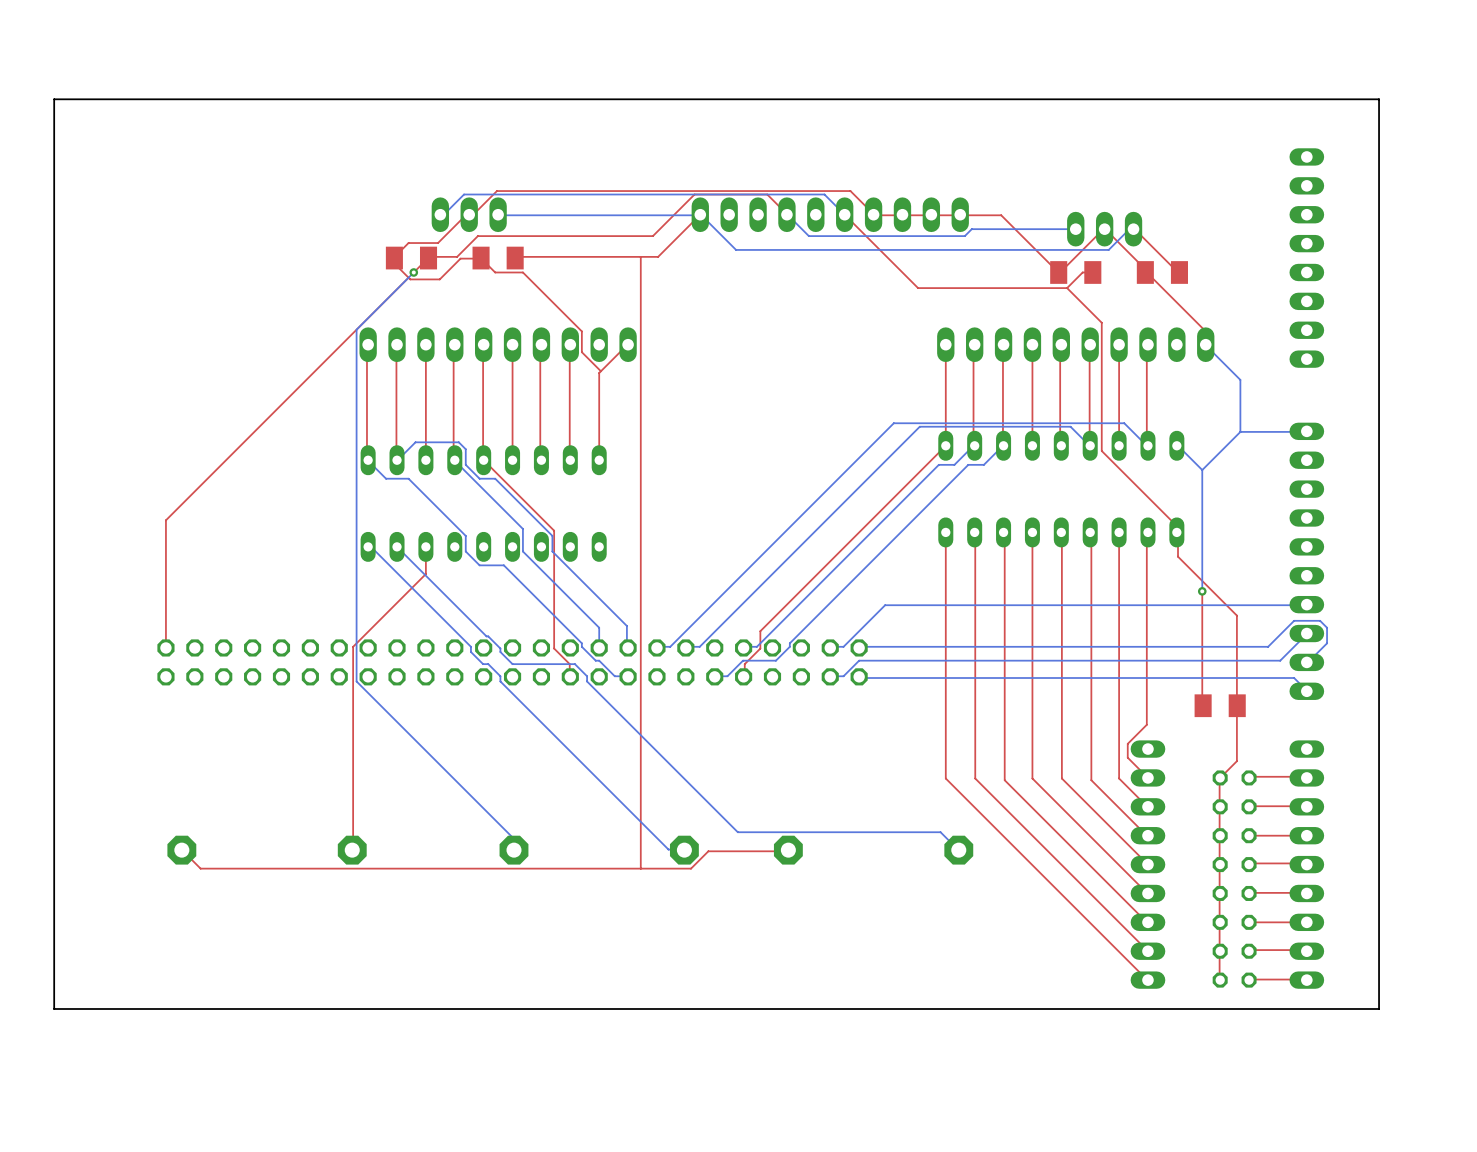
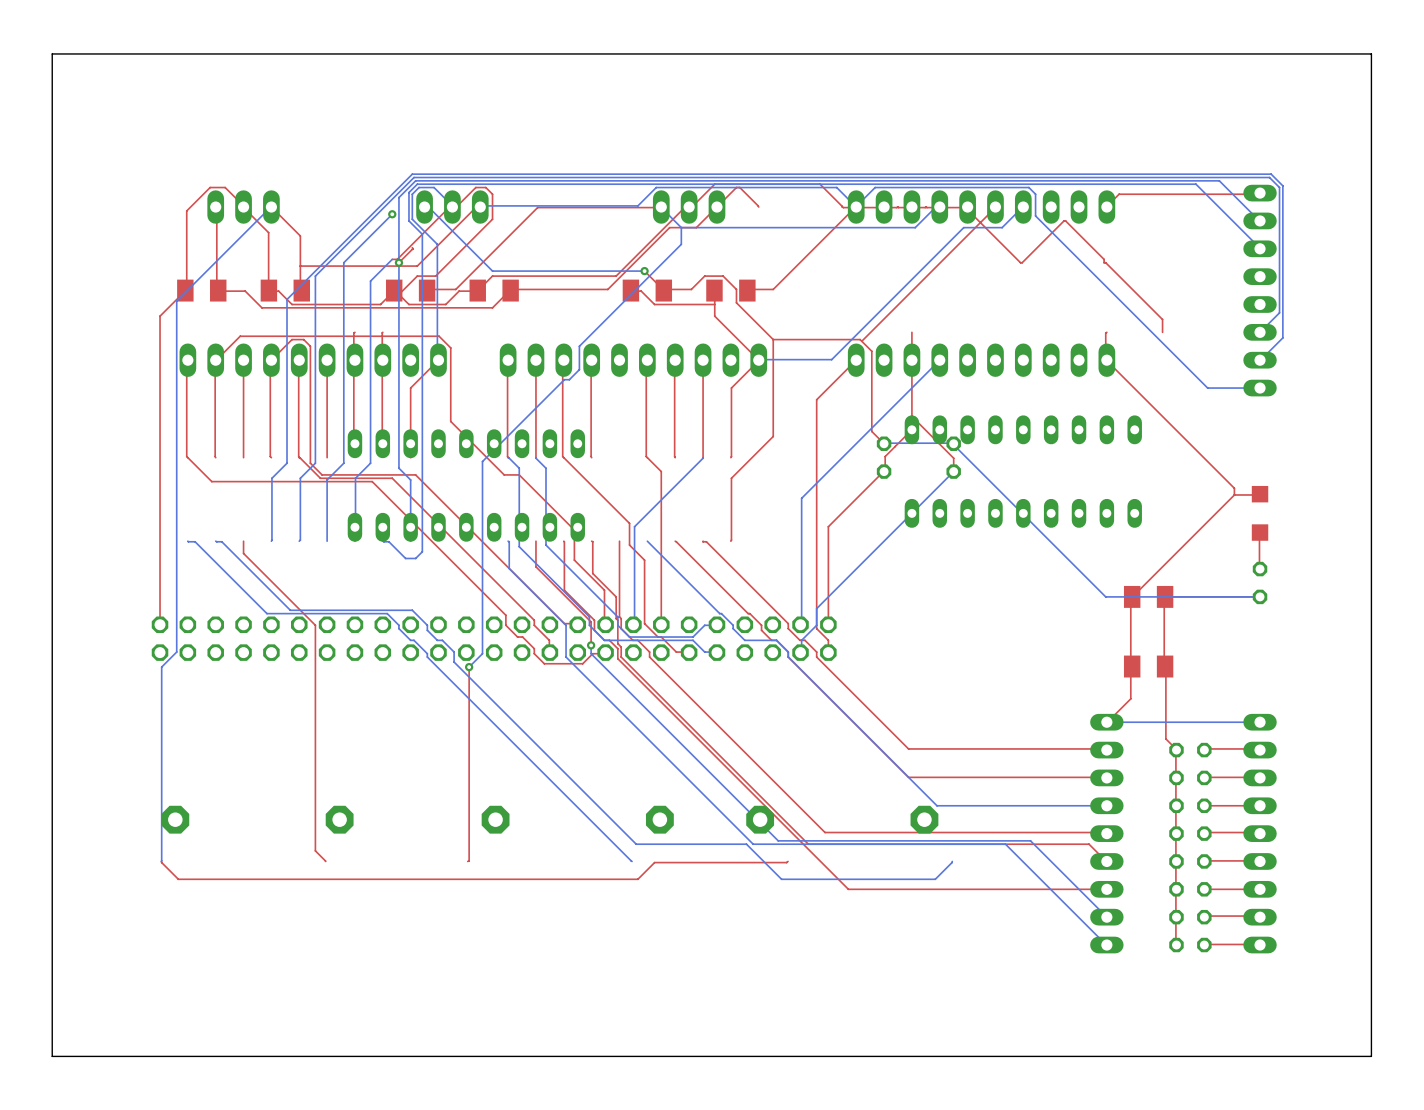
board edge: (54, 99) (1379, 99) (1379, 1008) (54, 1008) -> (52, 95) (52, 53) (1371, 53) (1371, 1056) (52, 1056) (52, 972)
top track: (741, 191) (496, 191) (493, 194) -> (714, 184) (693, 205) (684, 207) (616, 276) (492, 276) (477, 291) (459, 291) (445, 304) (408, 304) (394, 290)
top track: none -> (475, 187) (485, 187) (492, 194) (492, 219) (435, 276) (417, 276) (398, 294) (394, 290)
bottom track: (680, 194) (464, 194) (444, 213) (440, 214) -> (656, 187) (637, 205) (480, 207)
top track: (763, 194) (694, 194) (652, 236) (477, 236) (457, 256) (428, 258) -> (736, 187) (696, 227) (669, 227) (607, 289) (510, 289) (492, 307) (261, 307) (245, 291) (218, 291) (216, 289) (215, 207)
bottom track: (824, 194) (844, 214) -> (794, 187) (836, 187) (856, 207) (875, 187) (1028, 187) (1035, 194) (1035, 215) (1207, 388) (1260, 388)
top track: none -> (1260, 193) (1119, 194) (1105, 207)
part: none -> (243, 207)
top track: none -> (271, 207) (300, 235) (301, 290)
bottom track: none -> (271, 207) (176, 301) (176, 652) (161, 667) (161, 861)
bottom track: none -> (424, 207) (429, 207) (492, 271) (644, 271)
bottom track: none -> (452, 207) (434, 187) (419, 187) (412, 194) (412, 219) (437, 244) (438, 360)
top track: none -> (480, 207) (475, 207) (417, 266) (300, 266)
bottom track: (498, 214) (700, 214) (736, 249) (1108, 249) (1129, 229) (1133, 229) -> none
top track: none -> (661, 207) (537, 207) (455, 289) (427, 290)
bottom track: none -> (661, 207) (681, 227)
top track: (700, 214) (658, 256) (514, 256) -> none
part: none -> (689, 207)
bottom track: (786, 214) (808, 236) -> (681, 227) (779, 227)
part: (830, 214) -> none
top track: (844, 214) (918, 288) (1067, 288) -> none
top track: none -> (856, 207) (773, 289) (747, 290)
part: none -> (981, 207)
top track: none -> (995, 207) (861, 341)
bottom track: none -> (1023, 207) (1002, 227) (963, 227) (831, 359) (758, 360)
via: none -> (392, 214)
bottom track: (1075, 229) (971, 229) (964, 236) (949, 236) -> (939, 207) (935, 207) (915, 227)
part: (1104, 229) -> none
top track: (1133, 229) (1179, 272) -> none
bottom track: none -> (1260, 220) (1219, 180) (415, 180) (398, 197) (398, 468) (410, 479) (410, 541)
top track: (438, 243) (408, 243) (394, 256) (394, 263) (410, 279) (439, 279) (460, 258) (481, 258) (495, 272) (522, 272) (581, 331) (581, 352) (600, 371) -> (422, 234) (397, 259) (392, 259)
top track: (640, 256) (640, 643) -> (591, 541) (592, 573) (616, 596) (616, 618) (617, 620)
part: (411, 258) -> none
part: (498, 258) -> none
bottom track: none -> (1260, 248) (1195, 184) (417, 184) (408, 192) (408, 220) (422, 234) (422, 551) (415, 558) (405, 558) (388, 541) (382, 541)
part position: (1306, 258) -> (1260, 290)
bottom track: none -> (392, 259) (370, 281) (370, 463) (355, 478) (354, 541)
bottom track: (413, 272) (356, 329) -> (392, 214) (343, 262) (343, 317)
part: (1075, 272) -> none
top track: (1092, 272) (1082, 272) (1067, 288) -> none
part: (1162, 272) -> none
top track: (408, 277) (165, 520) -> (394, 290) (380, 304) (292, 304) (278, 291) (268, 290) (268, 232) (225, 187) (210, 187) (186, 210) (186, 289) (160, 316) (160, 501)
top track: none -> (644, 271) (663, 290) (691, 289) (704, 276) (723, 276) (736, 289) (736, 302) (773, 339)
via: none -> (644, 271)
top track: (1067, 288) (1101, 322) (1101, 450) (1176, 525) (1178, 556) (1236, 615) (1236, 761) (1220, 777) -> (1260, 596) (1164, 596) (1165, 738) (1176, 750)
part: none -> (201, 290)
part: none -> (285, 290)
part: none -> (410, 290)
part: none -> (494, 290)
top track: none -> (630, 290) (641, 291) (654, 304) (714, 304)
part: none -> (647, 290)
top track: none -> (714, 290) (714, 316) (758, 360) (731, 388) (730, 457)
part: none -> (730, 290)
top track: (425, 344) (425, 402) -> (438, 360) (410, 388)
top track: (454, 344) (454, 460) -> none
top track: (483, 344) (483, 459) (554, 530) (554, 643) -> (299, 360) (299, 457) (320, 478) (392, 478) (534, 620)
part: (498, 344) -> none
top track: (512, 344) (512, 460) -> none
top track: (541, 344) (541, 460) -> none
top track: (570, 344) (570, 460) -> none
top track: (628, 344) (599, 373) (599, 460) -> none
top track: (974, 344) (974, 445) -> none
top track: (1003, 344) (1003, 445) -> none
top track: (1032, 344) (1032, 445) -> none
top track: (1061, 344) (1061, 445) -> none
part position: (1075, 344) -> (981, 360)
top track: (1090, 344) (1090, 445) -> none
top track: (1119, 344) (1119, 445) -> none
bottom track: (1205, 344) (1240, 379) (1240, 431) -> none
bottom track: none -> (1260, 332) (1279, 312) (1279, 187) (1269, 177) (413, 177) (315, 276) (315, 463) (300, 478) (299, 541)
top track: none -> (773, 339) (860, 339) (871, 351) (871, 431) (884, 443)
top track: none -> (773, 339) (773, 436) (731, 478) (730, 541)
top track: none -> (187, 360) (186, 456) (211, 481) (372, 481) (505, 615) (505, 625) (517, 637) (522, 637) (534, 648) (534, 653) (544, 663) (582, 663) (592, 653) (605, 652)
top track: none -> (243, 360) (243, 457)
part: none -> (313, 360)
top track: none -> (327, 360) (327, 457)
top track: none -> (508, 360) (508, 457)
top track: none -> (535, 360) (535, 457)
top track: none -> (563, 360) (562, 456) (629, 523) (629, 545) (644, 560) (644, 623) (676, 652) (689, 652)
top track: none -> (591, 360) (591, 457)
part: none -> (633, 360)
top track: none -> (647, 360) (646, 456) (661, 471) (661, 624)
top track: none -> (675, 360) (675, 457)
top track: none -> (703, 360) (703, 457)
top track: none -> (856, 360) (816, 399) (816, 628) (828, 640) (828, 652)
top track: (1146, 373) (1147, 445) -> (1105, 359) (1234, 488) (1234, 494)
bottom track: none -> (1260, 360) (1282, 337) (1282, 185) (1271, 174) (412, 174) (287, 299) (287, 463) (271, 478) (271, 541)
top track: none -> (911, 416) (953, 458) (953, 471)
bottom track: (1240, 431) (1202, 470) -> none
bottom track: (1306, 431) (1240, 431) -> none
bottom track: (974, 445) (954, 464) (938, 464) (756, 646) (743, 647) -> none
bottom track: (1003, 445) (983, 464) (968, 464) (789, 643) (789, 646) (775, 660) (743, 660) (727, 676) (714, 676) -> none
bottom track: (1090, 445) (1070, 426) (919, 426) (699, 646) (685, 647) -> none
bottom track: (1147, 445) (1124, 423) (893, 423) (670, 646) (658, 646) -> (703, 457) (634, 526) (634, 623)
bottom track: (1176, 445) (1202, 470) -> none
bottom track: (368, 460) (386, 478) (408, 478) (465, 535) (465, 551) (479, 565) (503, 565) (528, 589) -> (508, 541) (509, 568)
bottom track: (397, 460) (415, 442) (458, 442) (465, 449) (465, 464) (479, 478) (495, 478) (552, 535) (552, 551) (566, 565) -> (535, 457) (545, 468) (545, 545)
bottom track: (454, 460) (522, 528) (522, 551) (538, 567) -> (508, 457) (519, 468) (519, 546)
bottom track: none -> (884, 443) (953, 443) (1105, 596) (1260, 596)
bottom track: (1202, 470) (1202, 591) -> none
top track: (918, 473) (760, 631) (760, 648) (744, 664) (743, 676) -> (885, 456) (885, 471) (828, 526) (828, 624)
top track: none -> (215, 457) (215, 361) (240, 336) (439, 336) (450, 347) (450, 421) (504, 474) (519, 474) (574, 530) (574, 560) (604, 590) (605, 624)
top track: none -> (271, 457) (270, 361) (292, 339) (303, 339) (310, 346) (310, 463) (322, 474) (415, 474) (564, 623) (577, 624)
part: none -> (884, 457)
part: none -> (953, 457)
bottom track: (356, 480) (356, 681) (512, 837) (513, 850) -> (343, 463) (327, 479) (327, 541)
top track: none -> (1260, 494) (1234, 494)
top track: none -> (1234, 494) (1130, 596) (1130, 698) (1106, 722)
top track: (945, 532) (945, 778) (1147, 980) -> none
top track: (974, 532) (975, 778) (1147, 951) -> none
top track: (1003, 532) (1004, 780) (1146, 922) -> (617, 658) (848, 889) (1105, 889)
top track: (1032, 532) (1032, 778) (1129, 875) -> (617, 643) (621, 647) (621, 657) (808, 844) (1089, 844)
top track: (1061, 532) (1061, 778) (1146, 863) -> (619, 541) (621, 628) (632, 640) (637, 640) (649, 652) (649, 657) (825, 832) (1105, 832)
top track: (1090, 532) (1091, 780) (1147, 835) -> none
top track: (1119, 532) (1119, 778) (1146, 806) -> (675, 541) (761, 625) (761, 630) (771, 640) (776, 640) (788, 652) (788, 657) (908, 777) (1105, 777)
top track: (1147, 532) (1146, 724) (1127, 743) (1127, 757) (1146, 776) -> (703, 541) (706, 541) (788, 623) (788, 628) (799, 640) (804, 640) (816, 652) (816, 657) (908, 748) (1105, 748)
part: none -> (1260, 513)
bottom track: (368, 546) (372, 548) (470, 646) (470, 652) (483, 664) (488, 664) (500, 676) -> none
bottom track: (397, 546) (500, 648) -> (681, 227) (681, 244) (579, 346) (579, 369) (569, 379) (564, 379) (482, 461) (482, 625)
top track: (425, 546) (425, 574) (353, 646) (352, 850) -> none
top track: none -> (1260, 532) (1260, 569)
bottom track: none -> (187, 541) (195, 541) (266, 613) (387, 613) (398, 625) (398, 628) (410, 640) (413, 640) (427, 653) (427, 657) (632, 861)
bottom track: none -> (215, 541) (221, 541) (290, 610) (412, 610) (427, 625) (427, 630) (437, 640) (442, 640) (454, 652) (454, 662) (636, 844) (746, 844) (781, 879) (935, 879) (952, 861)
top track: none -> (243, 541) (243, 553) (315, 625) (315, 850) (325, 861)
top track: none -> (535, 541) (535, 566) (591, 621) (591, 645)
bottom track: none -> (647, 541) (733, 625) (733, 628) (744, 640) (776, 640) (788, 652) (788, 657) (936, 805) (1106, 805)
part: (1306, 561) -> none
top track: (1202, 591) (1203, 705) -> none
via: (1202, 591) -> none
bottom track: (1306, 604) (885, 605) (843, 646) (831, 646) -> (939, 360) (801, 498) (801, 623)
part: none -> (1260, 582)
part: none -> (1148, 596)
bottom track: (626, 626) (628, 647) -> (604, 603) (617, 616) (617, 625) (629, 637) (693, 637) (704, 625) (716, 624)
bottom track: (599, 627) (599, 647) -> (577, 605) (589, 616) (589, 625) (604, 640) (693, 640) (704, 652) (716, 652)
bottom track: (1306, 633) (1280, 660) (859, 660) (843, 676) (831, 676) -> (953, 471) (816, 608) (816, 625) (801, 640) (801, 652)
bottom track: (581, 643) (581, 646) (595, 660) (599, 660) (614, 676) (628, 676) -> (561, 620) (566, 625) (566, 652)
bottom track: (859, 647) (1268, 646) (1294, 620) (1320, 620) (1327, 627) (1327, 643) (1306, 662) -> none
bottom track: (500, 652) (512, 664) (574, 664) (587, 676) -> (482, 628) (482, 652)
top track: (640, 667) (640, 672) -> (563, 541) (564, 590) (594, 620) (594, 630) (604, 640) (609, 640) (617, 648)
bottom track: none -> (591, 645) (591, 653) (778, 840) (1030, 840) (1106, 917)
via: none -> (591, 645)
bottom track: (859, 676) (1294, 678) (1306, 691) -> none
bottom track: (500, 678) (500, 681) (668, 849) (684, 850) -> (482, 653) (469, 667)
top track: (640, 683) (640, 868) -> none
top track: none -> (469, 667) (467, 861)
via: none -> (469, 667)
part position: (1220, 705) -> (1148, 666)
bottom track: none -> (1260, 722) (1106, 722)
bottom track: (737, 832) (940, 832) (958, 850) -> (711, 802) (753, 844) (1005, 844) (1106, 945)
top track: (788, 850) (708, 851) (691, 868) (200, 868) (181, 850) -> none
top track: none -> (787, 861) (654, 862) (637, 879) (178, 879) (161, 861)

